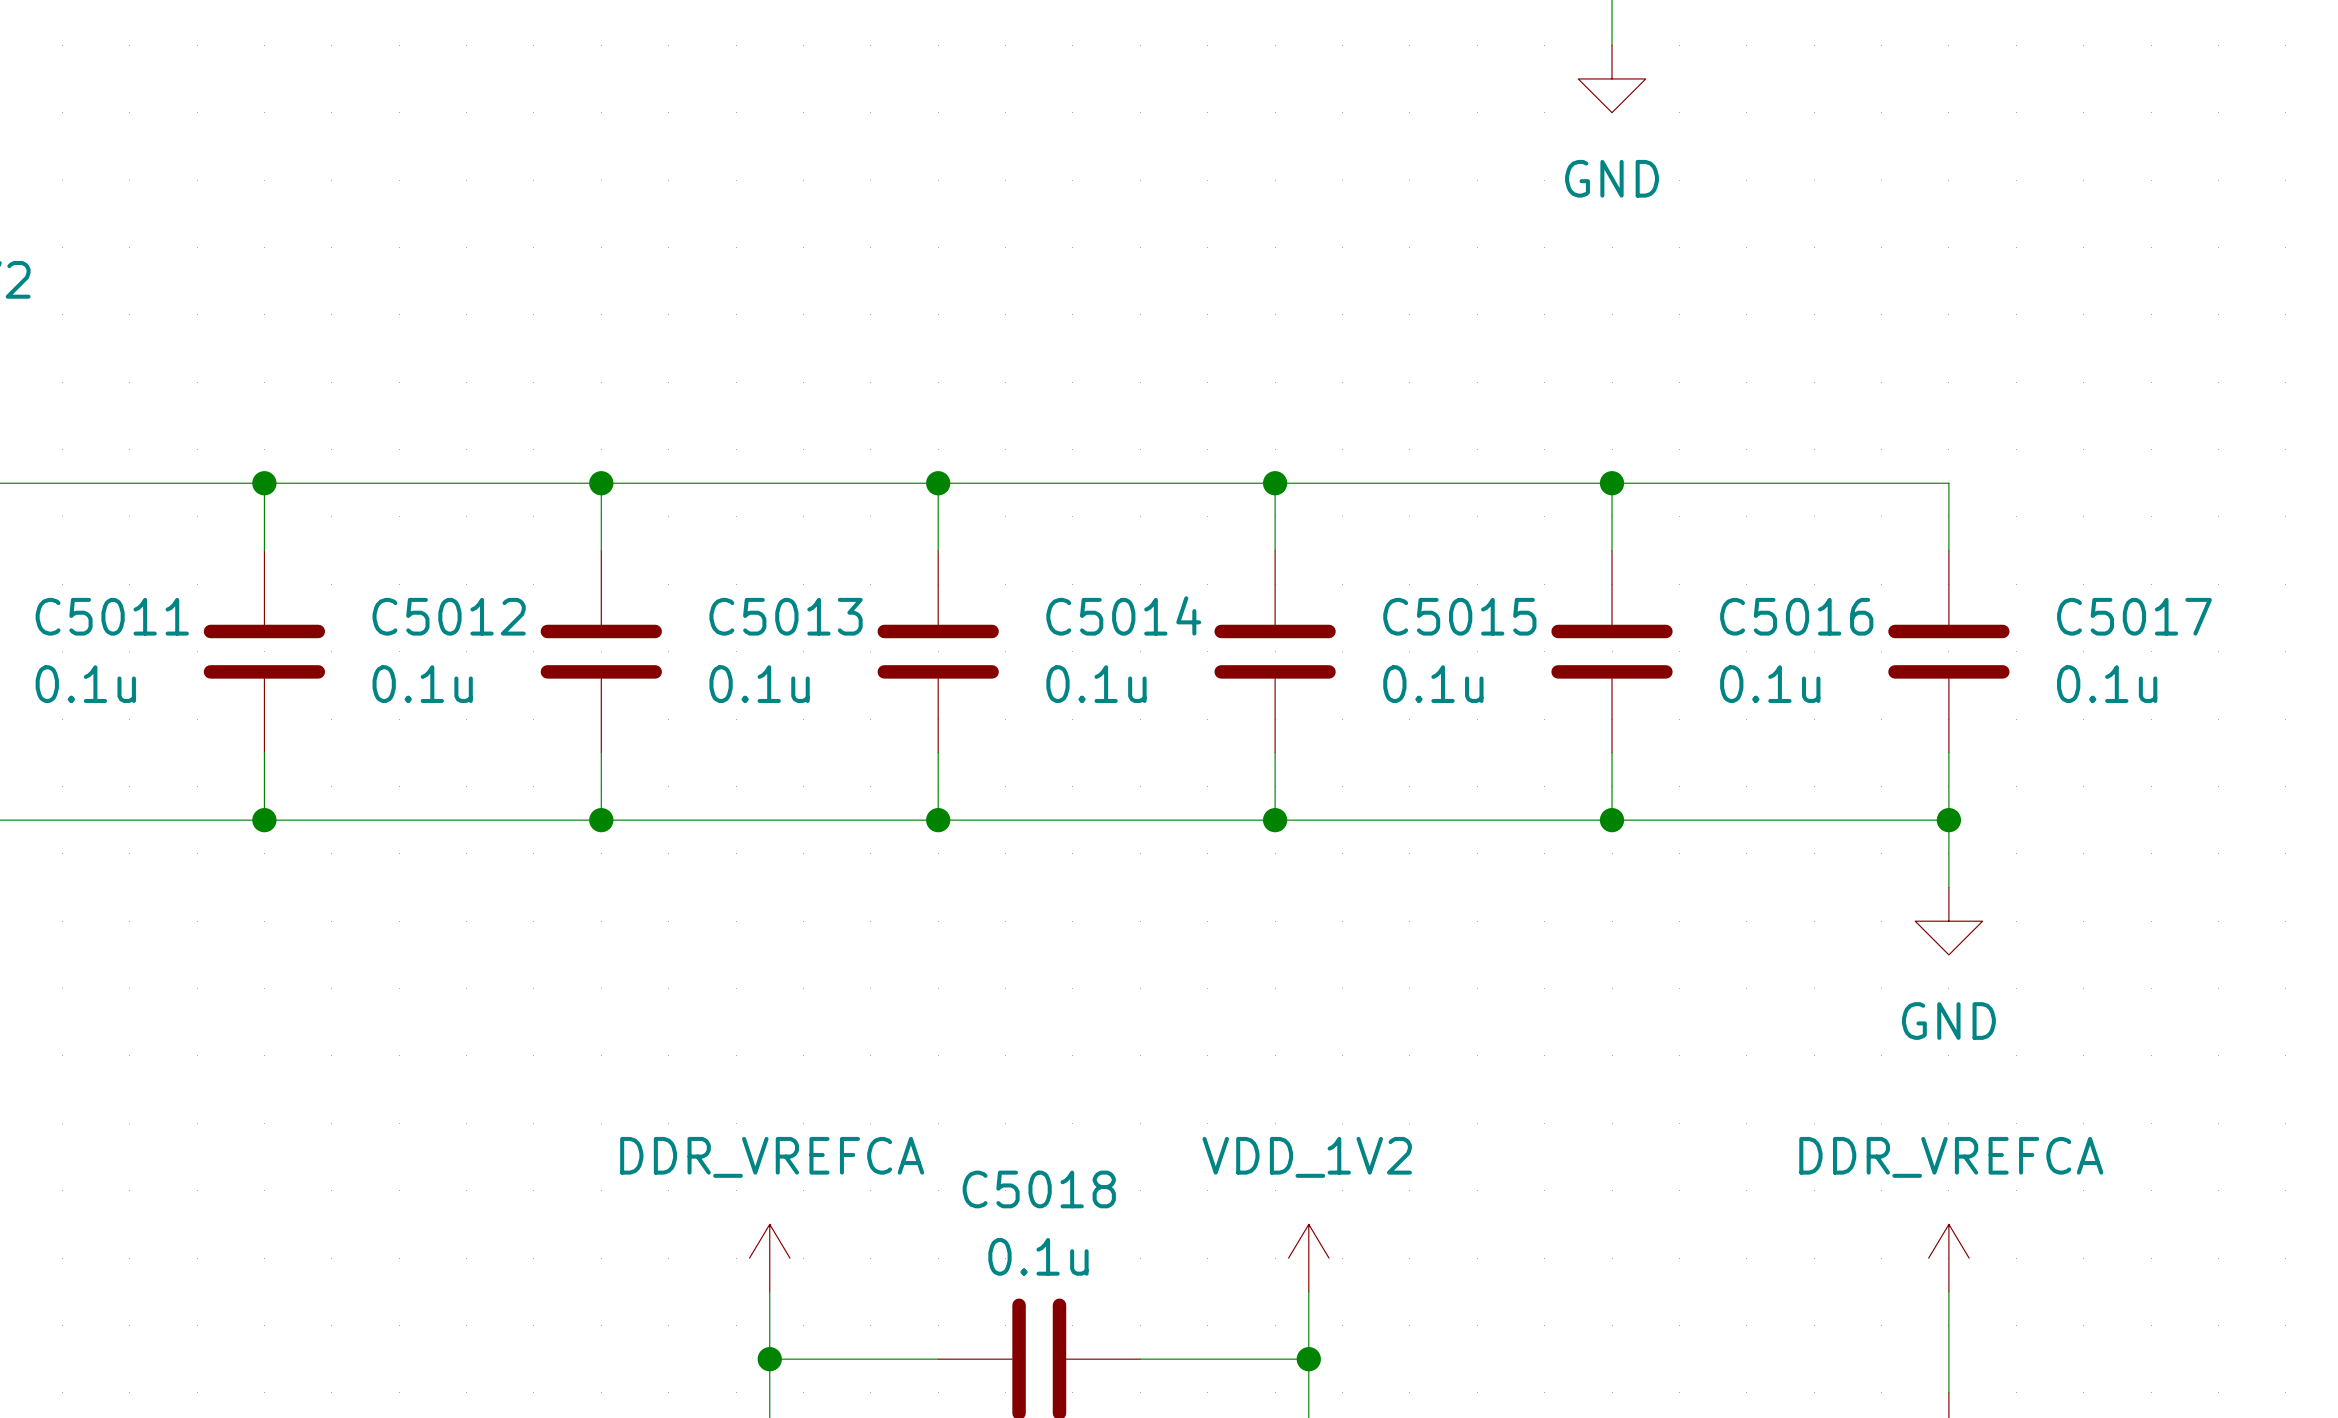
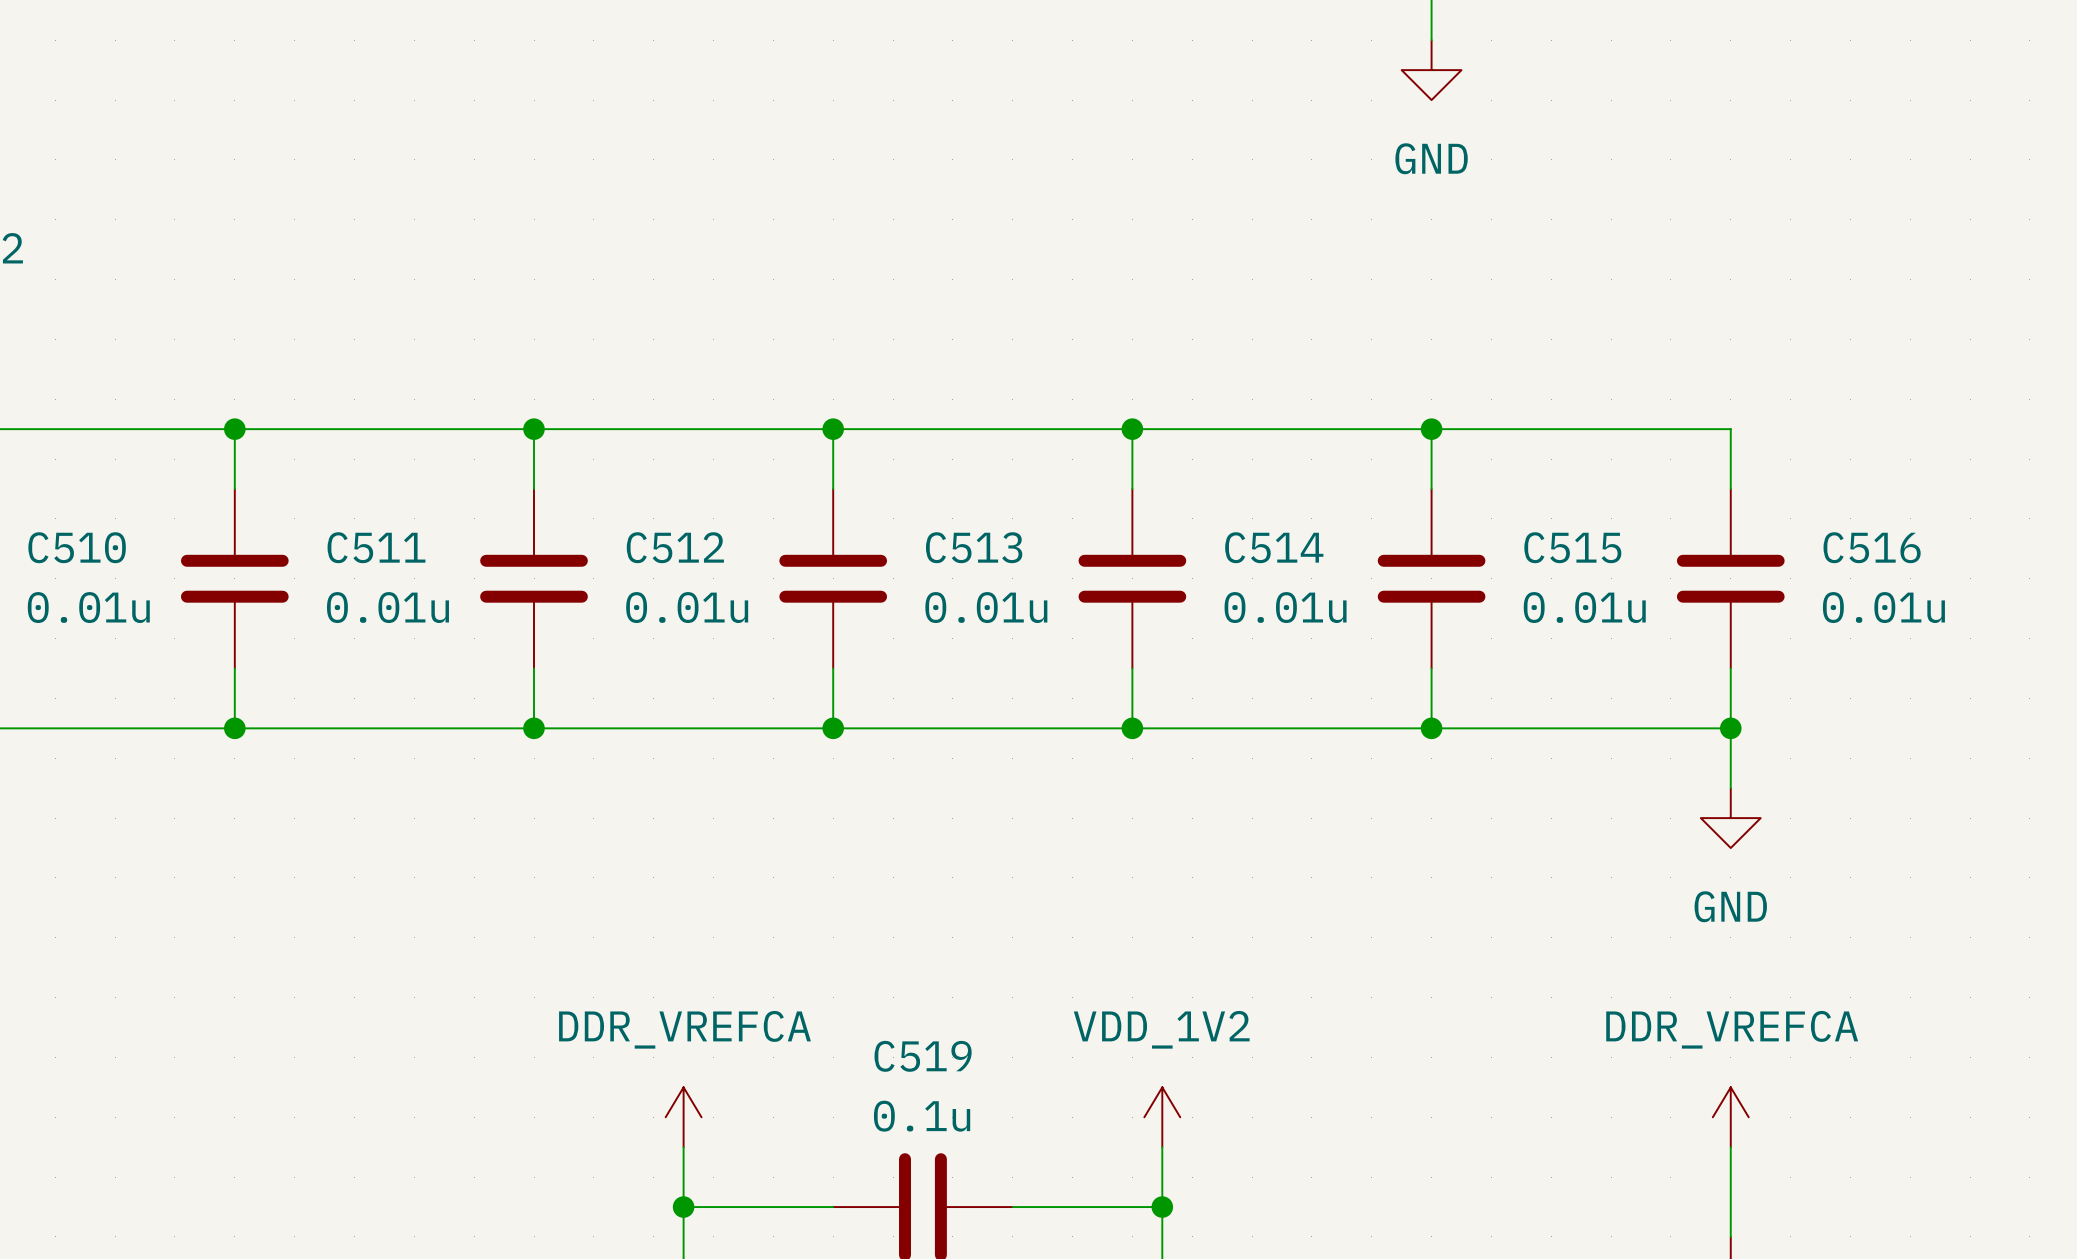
C5014 name: C5014 (1123, 615) -> C513 (974, 547)
C5011 name: C5011 (112, 616) -> C510 (77, 547)
C5012 name: C5012 (449, 616) -> C511 (376, 547)
C5013 name: C5013 (786, 616) -> C512 (675, 547)
C5015 name: C5015 (1459, 616) -> C514 (1274, 547)
C5016 name: C5016 (1796, 616) -> C515 (1572, 547)
C5017 name: C5017 (2134, 616) -> C516 (1872, 547)
C5011 value: 0.1u (85, 684) -> 0.01u (88, 607)
C5012 value: 0.1u (422, 684) -> 0.01u (387, 607)
C5013 value: 0.1u (759, 684) -> 0.01u (687, 607)
C5014 value: 0.1u (1096, 684) -> 0.01u (986, 607)
C5015 value: 0.1u (1433, 684) -> 0.01u (1285, 607)
C5016 value: 0.1u (1770, 684) -> 0.01u (1584, 607)
C5017 value: 0.1u (2107, 684) -> 0.01u (1883, 607)
C5018 name: C5018 (1039, 1189) -> C519 (923, 1056)

